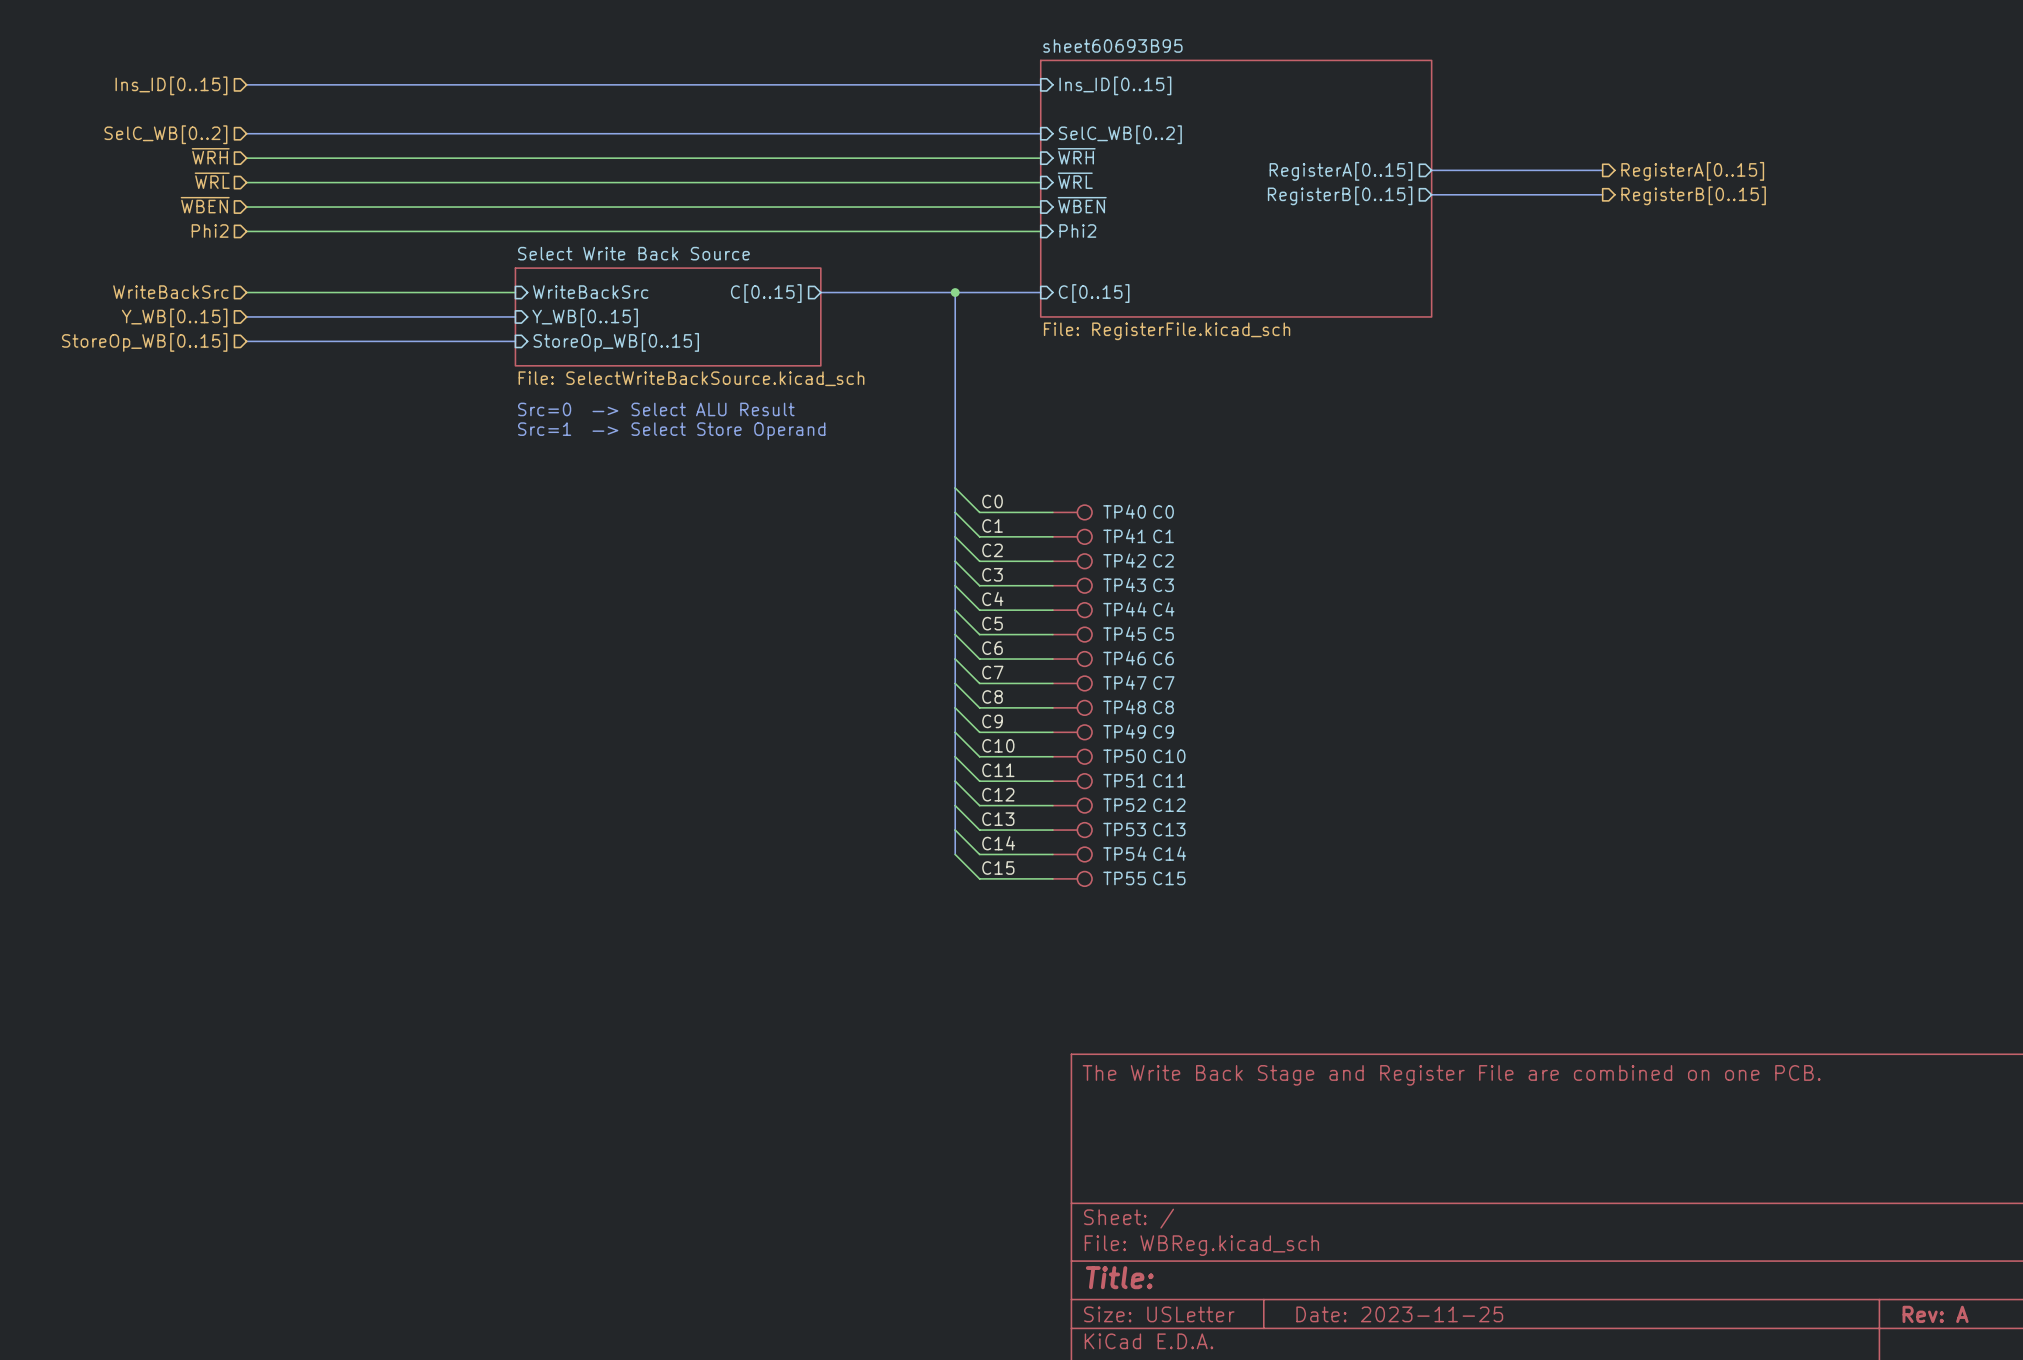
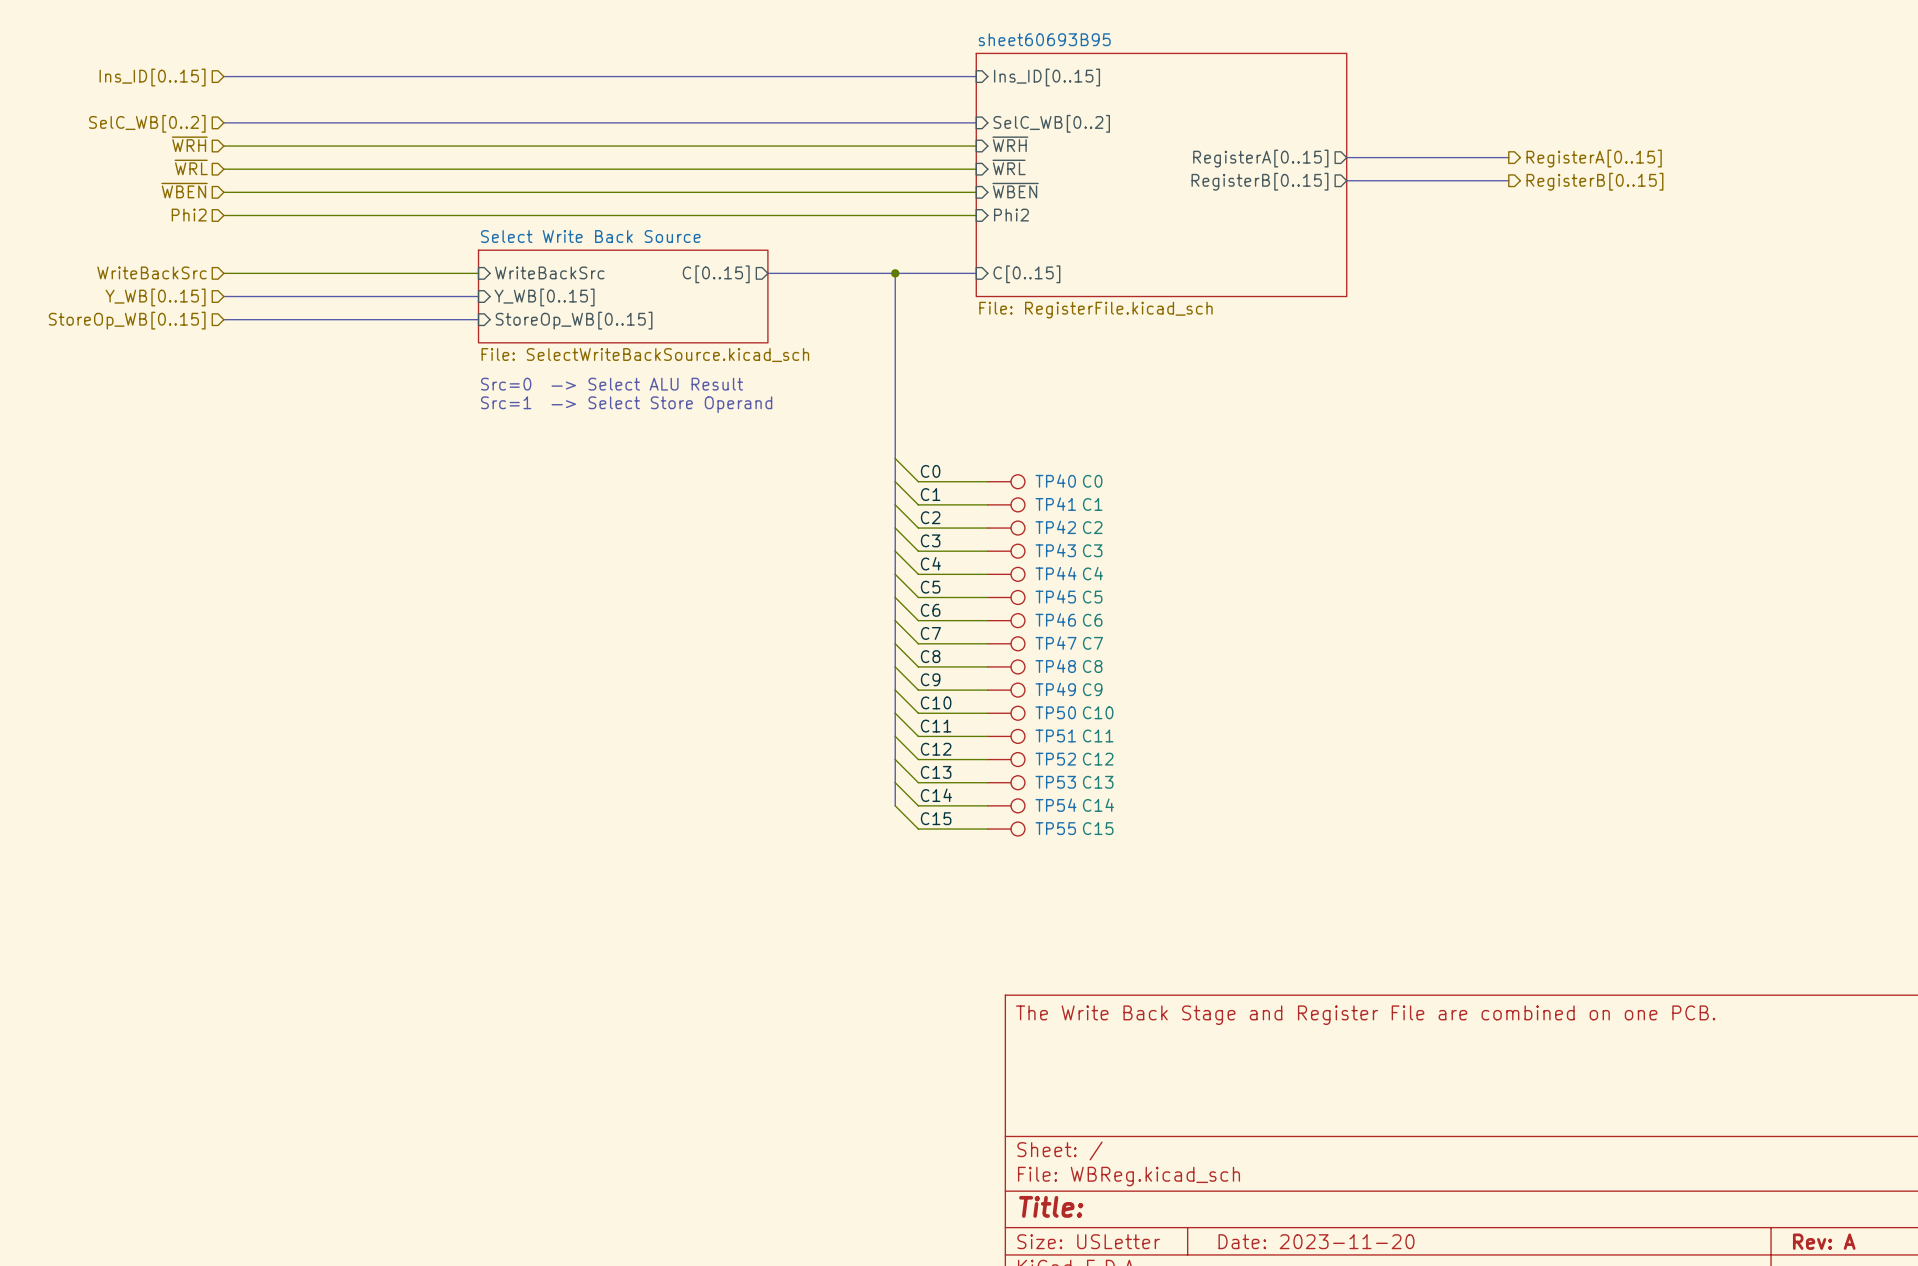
title block: Date: 2023-11-25 (1399, 1314) -> Date: 2023-11-20 (1316, 1241)

